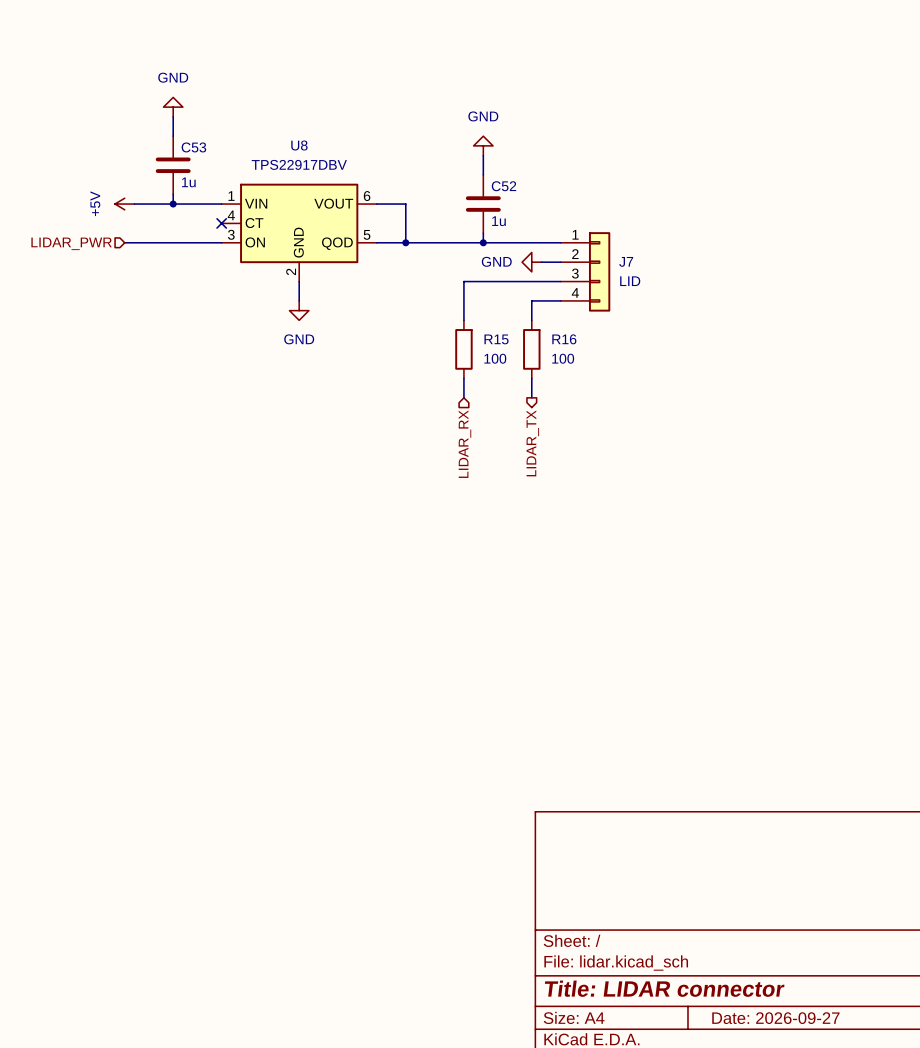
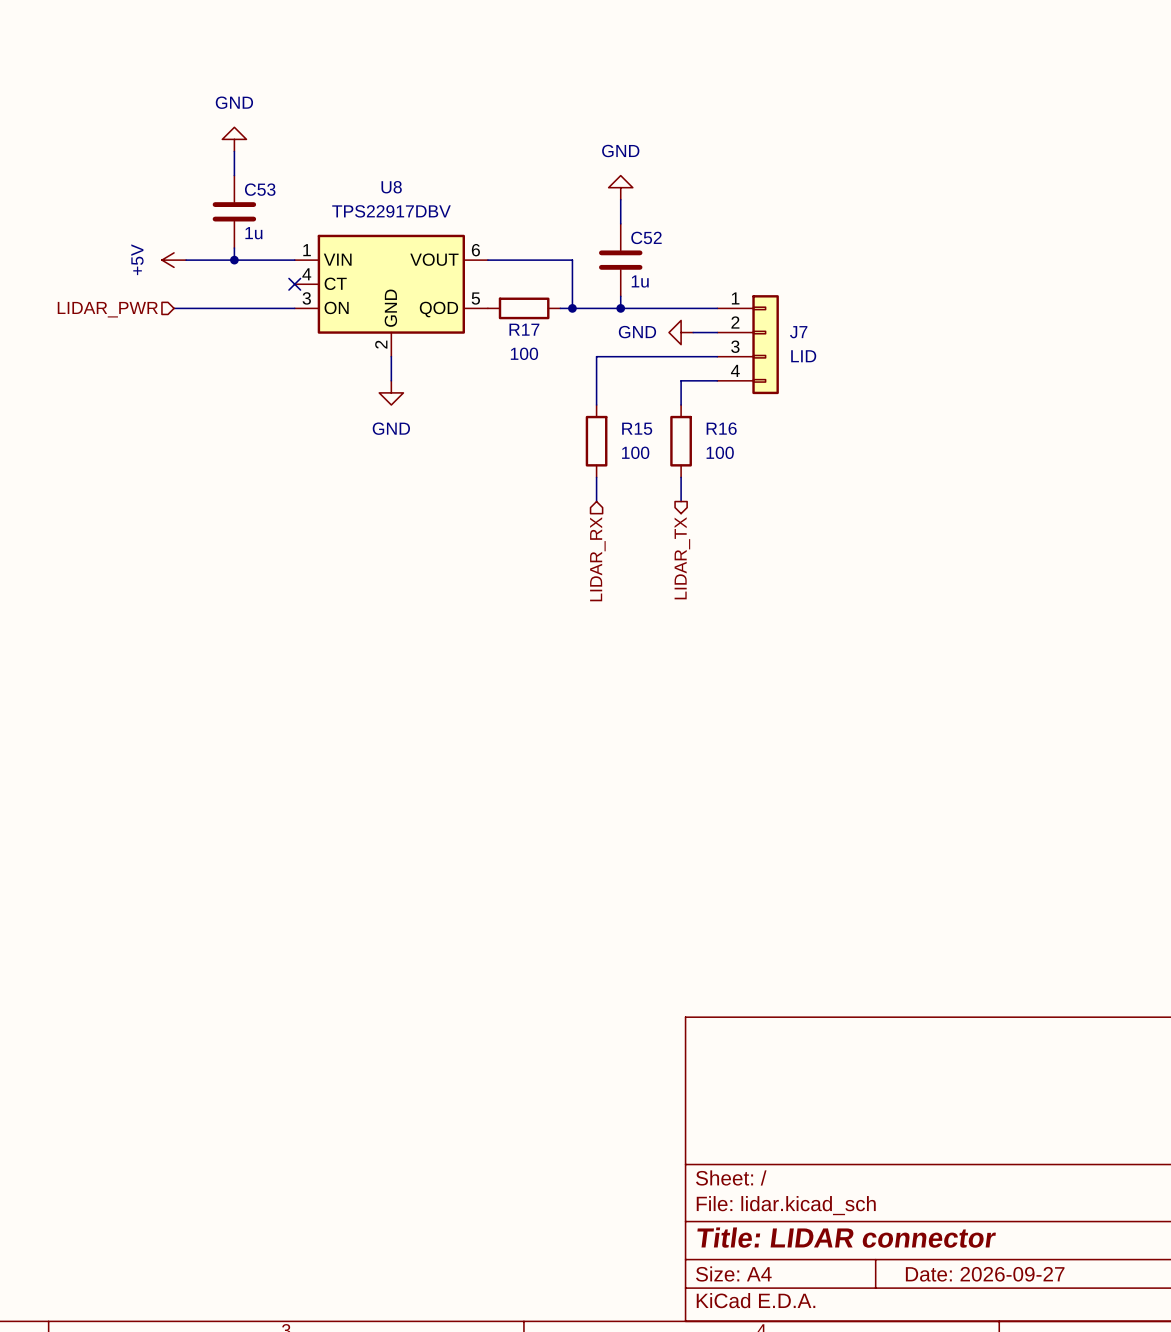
wire: (405, 204) (405, 242) -> (524, 260) (572, 260) (572, 308)
wire: (376, 242) (434, 242) -> none
junction position: (405, 242) -> (572, 308)
R17: none -> 100 (524, 308)

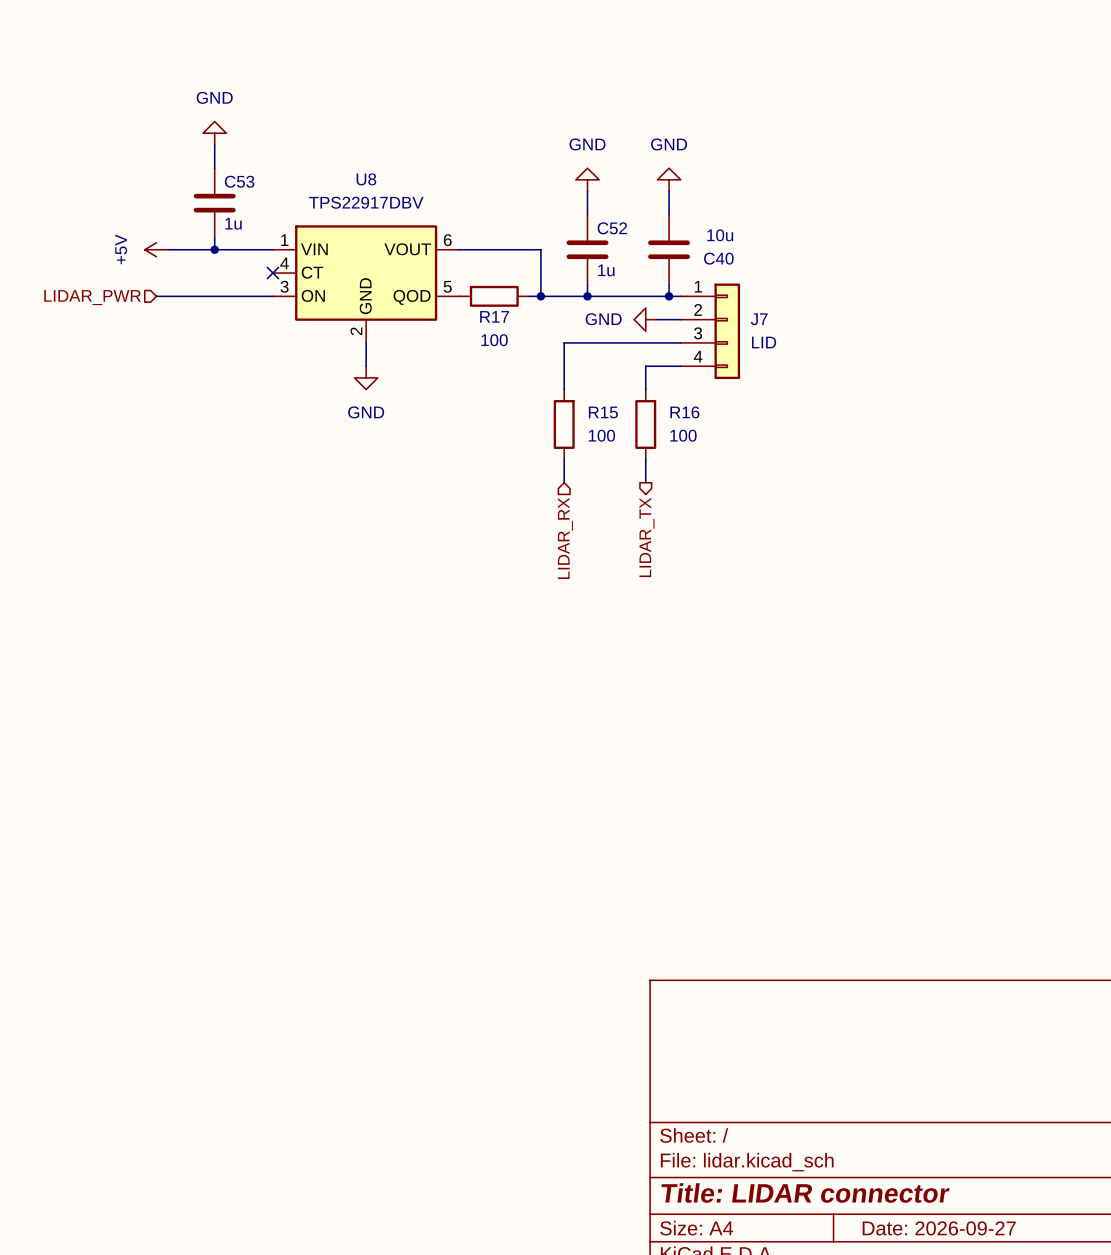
power symbol: none -> GND (669, 179)
wire: none -> (669, 191) (669, 214)
C40: none -> 10u (669, 249)
wire: none -> (669, 284) (669, 296)
junction: none -> (669, 296)

